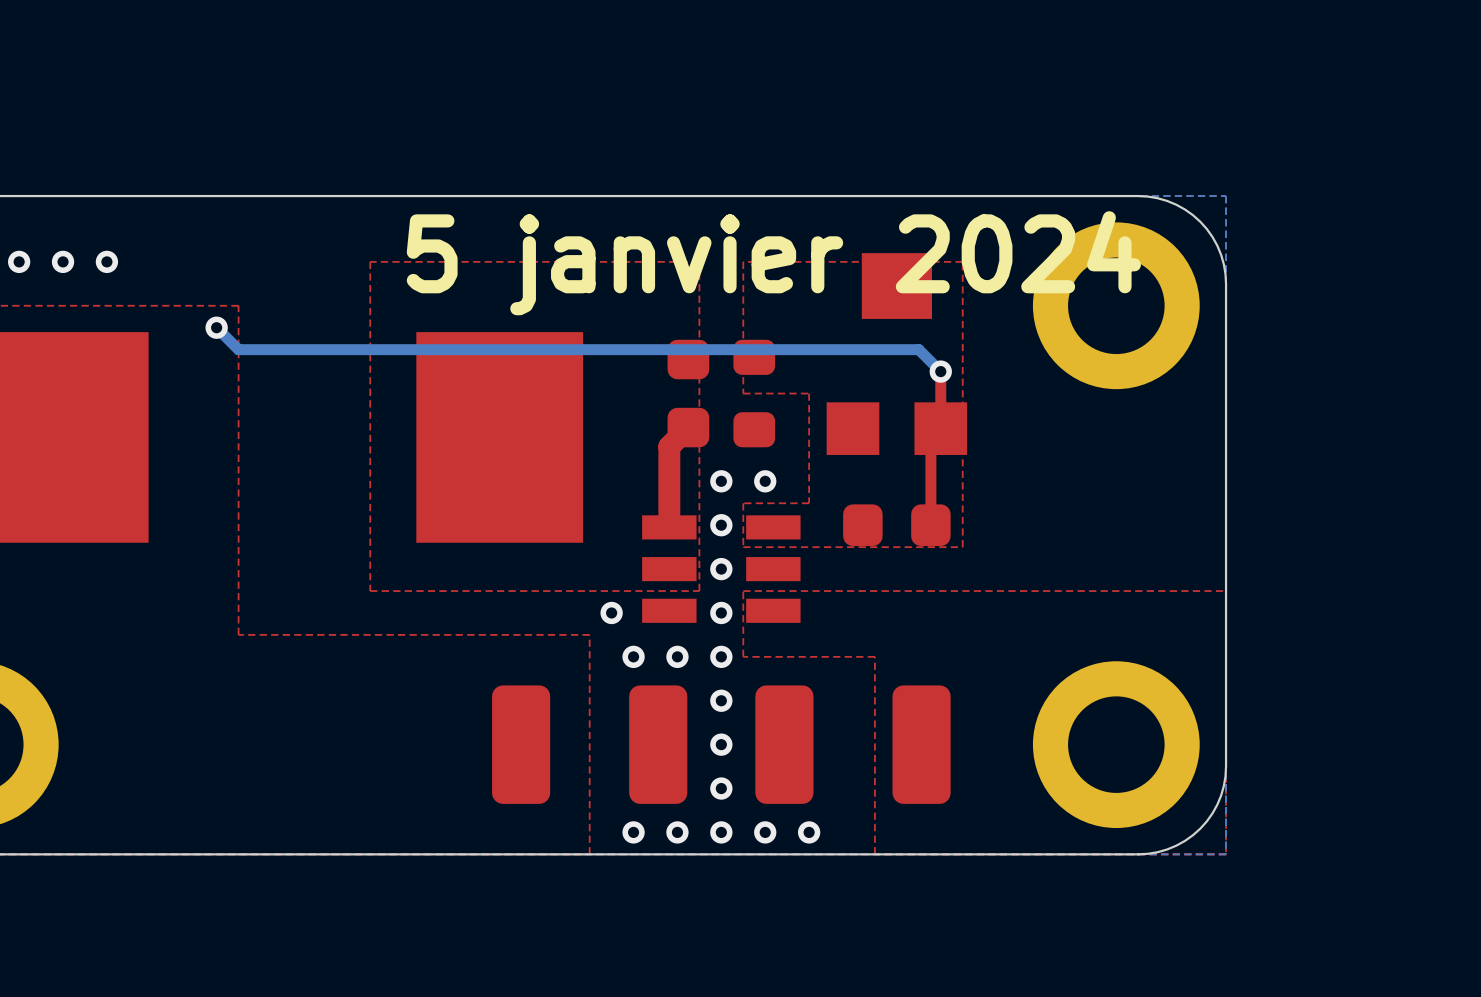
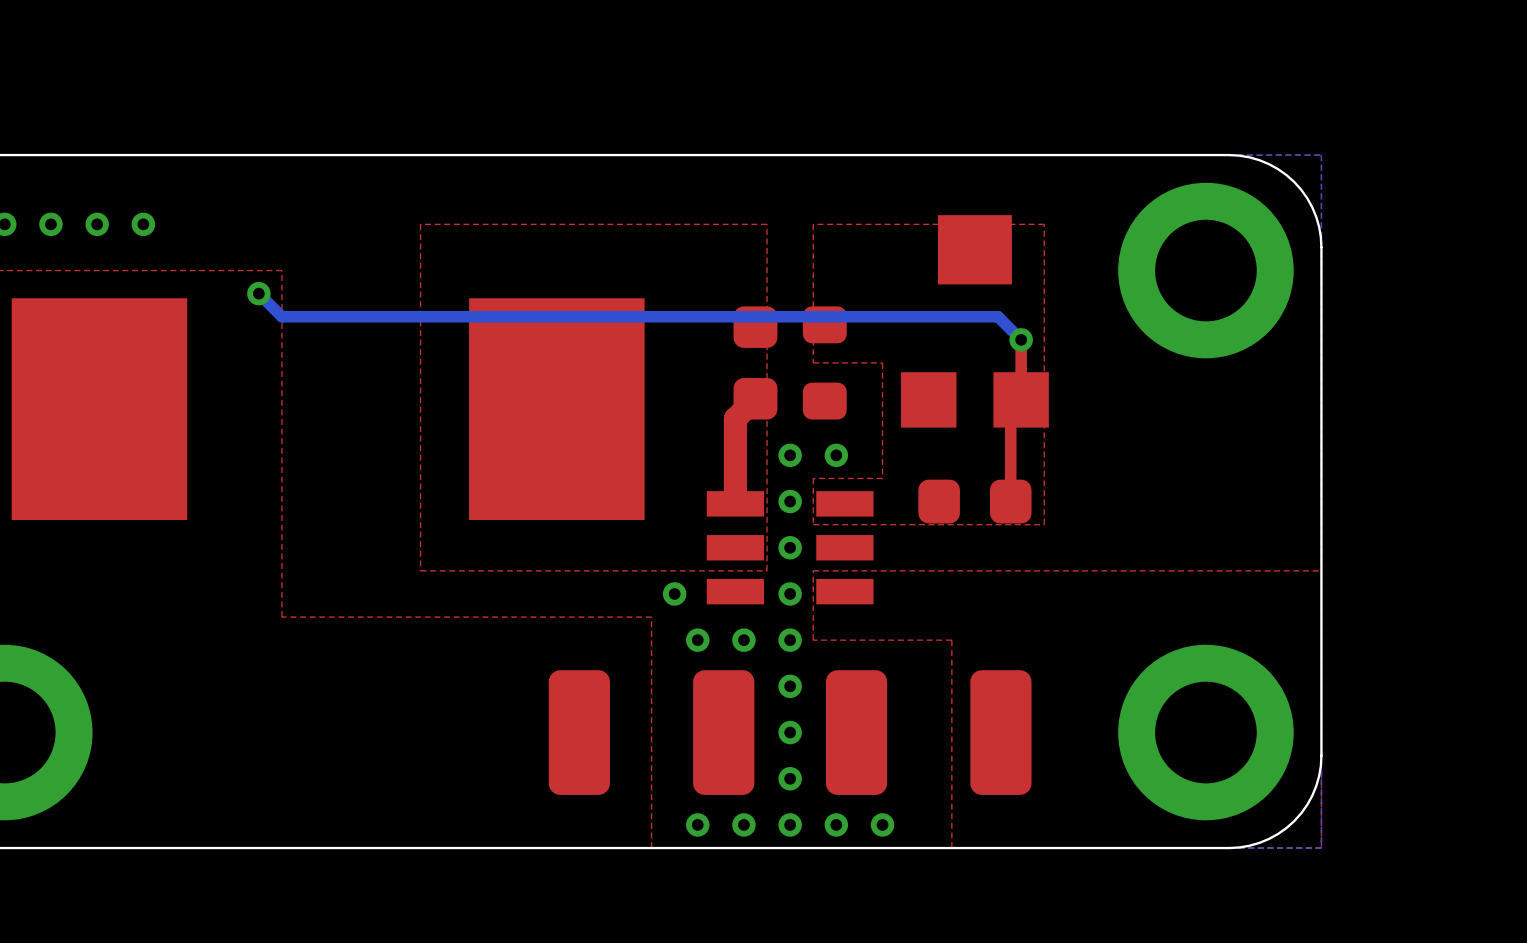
text: 5 janvier 2024 (773, 263) -> none

